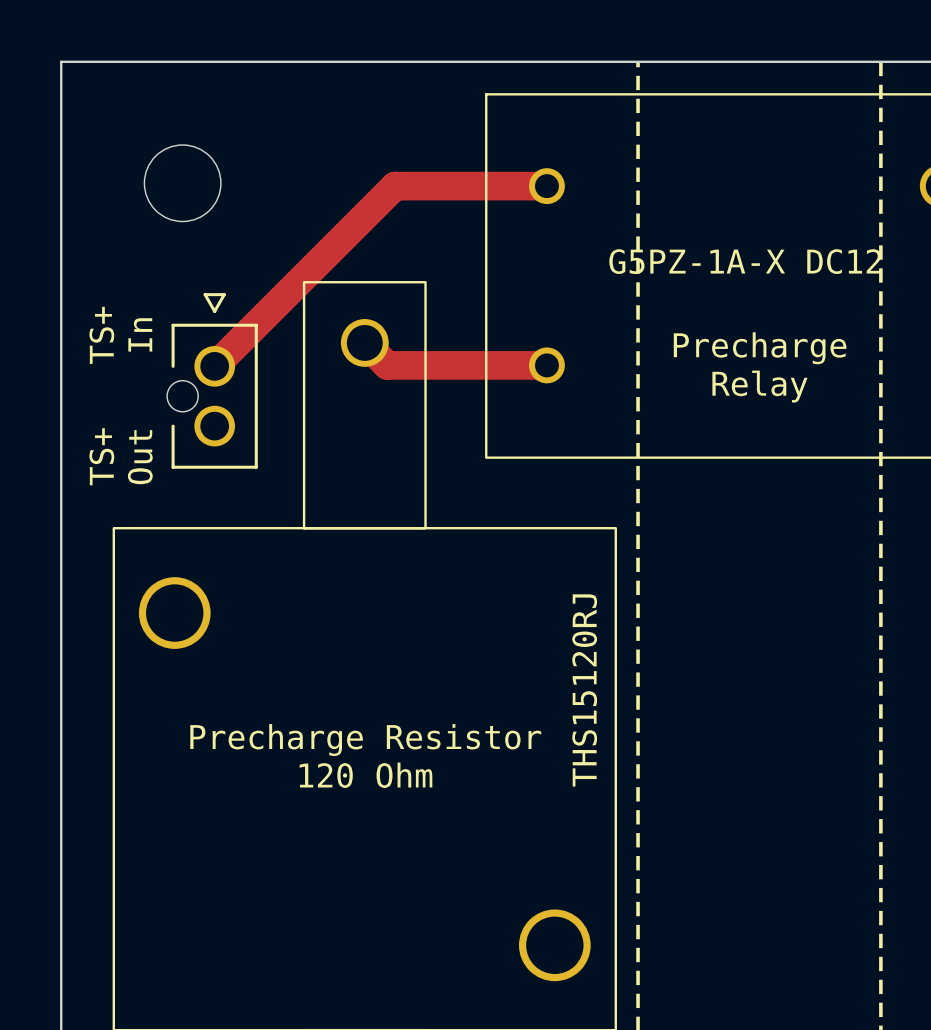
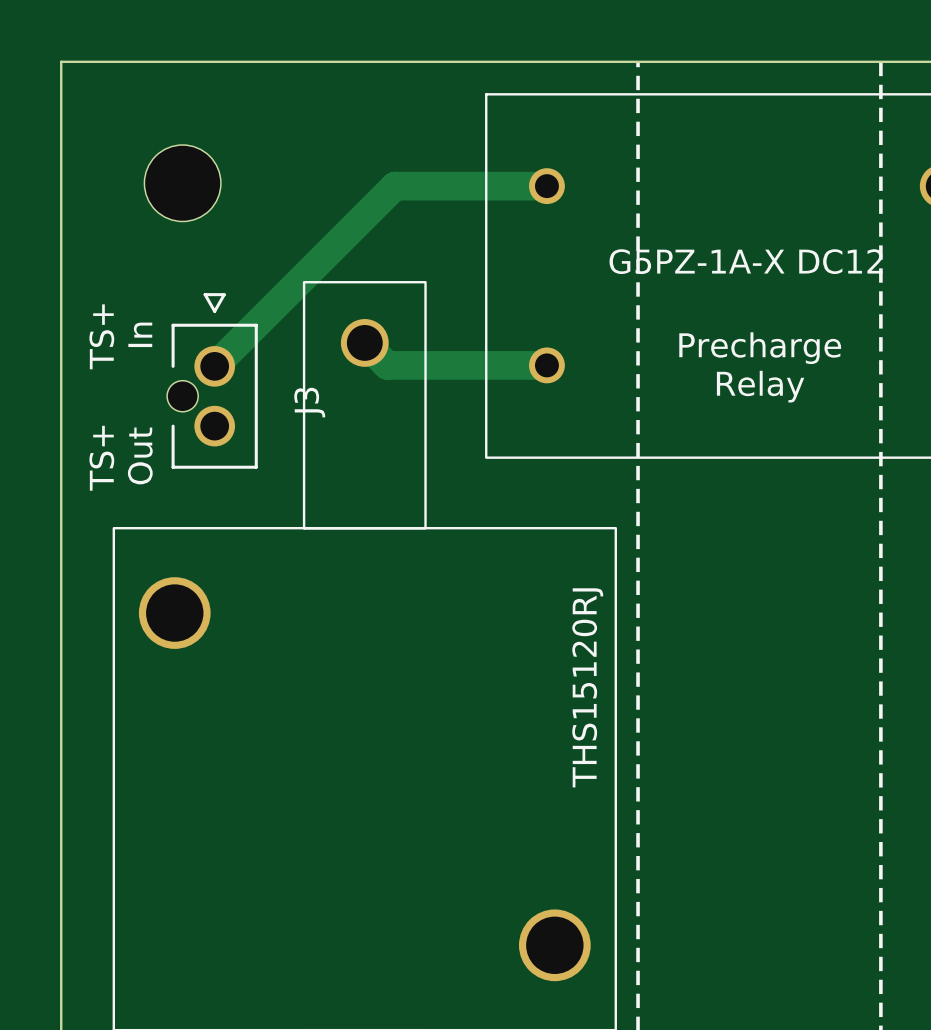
J3 name: none -> J3 (309, 402)
text: Precharge Resistor (365, 740) -> none
text: 120 Ohm (365, 775) -> none

